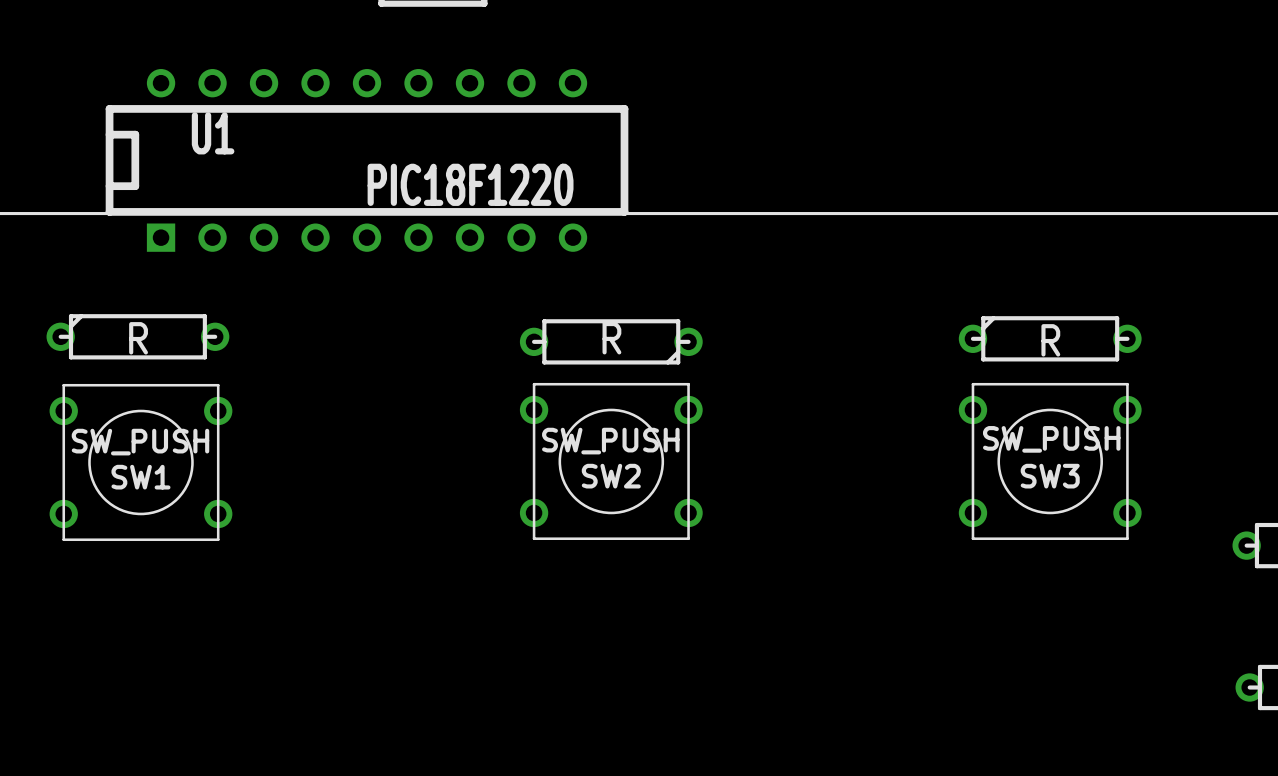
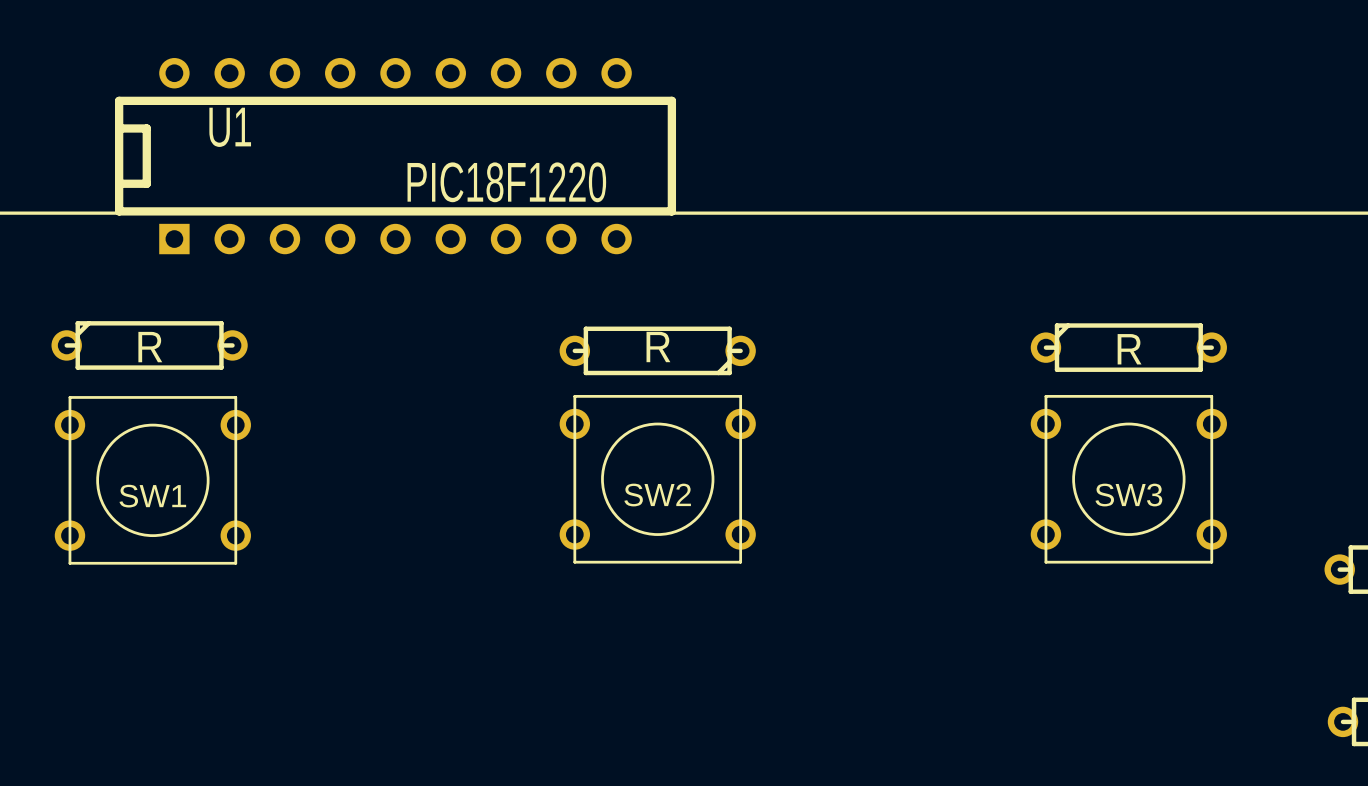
SW3 value: SW_PUSH (1051, 439) -> none
SW2 value: SW_PUSH (610, 441) -> none
SW1 value: SW_PUSH (140, 442) -> none

